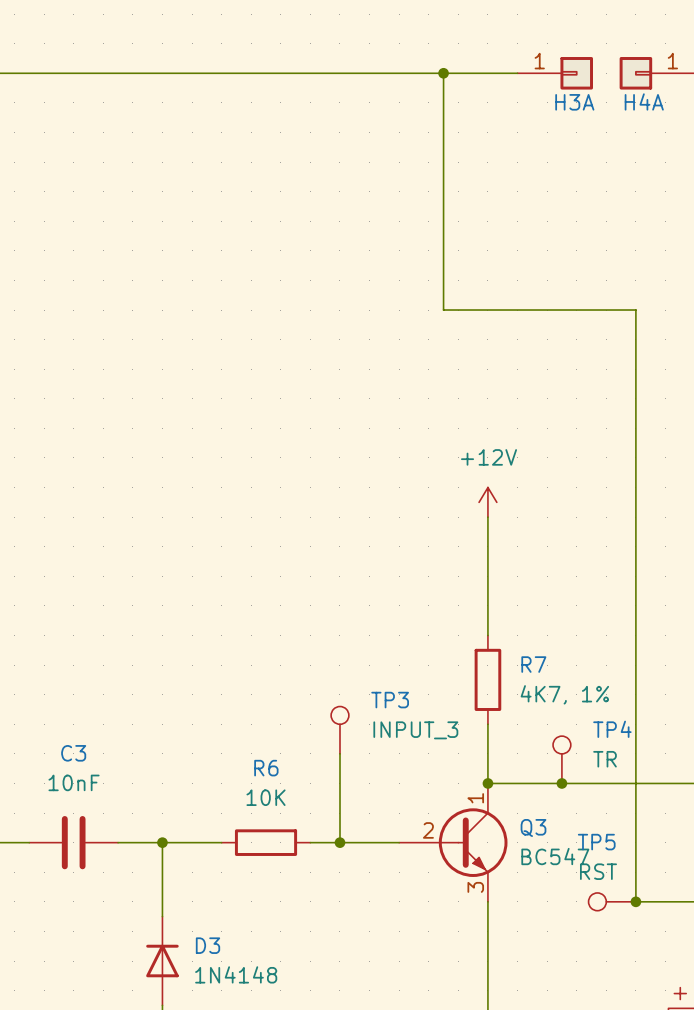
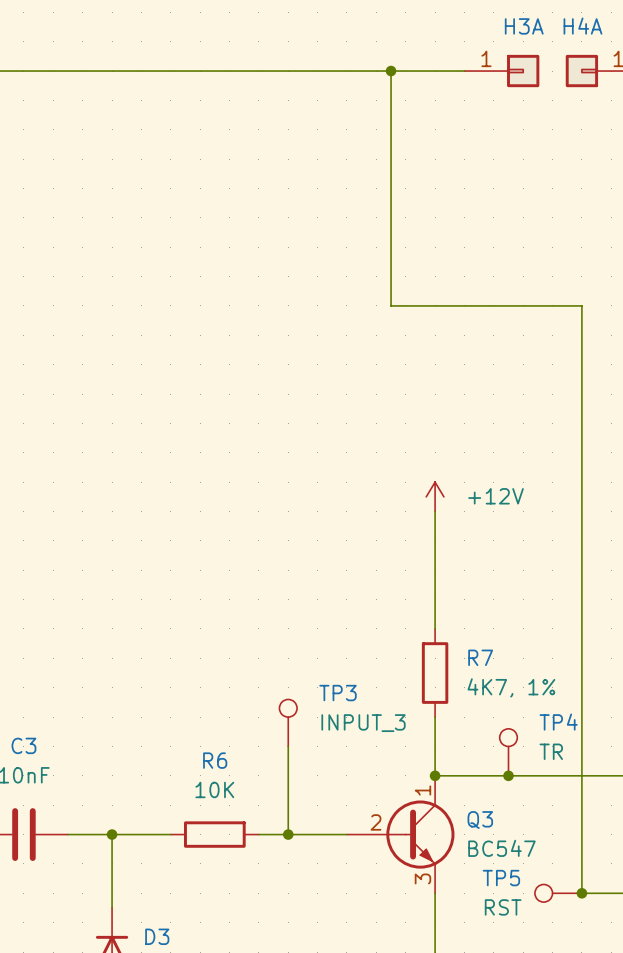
H4A name position: H4A (644, 101) -> H4A (582, 26)
H3A name position: H3A (574, 102) -> H3A (524, 26)
power symbol text position: +12V (489, 457) -> +12V (496, 496)
TP5 name position: TP5 (596, 842) -> TP5 (501, 878)
TP5 value position: RST (598, 871) -> RST (503, 907)

